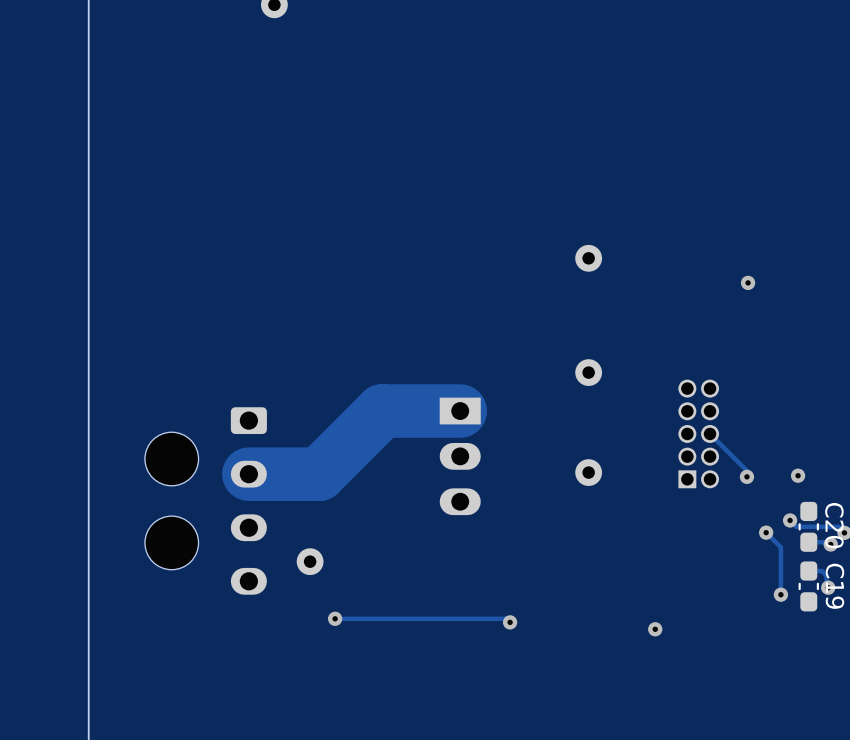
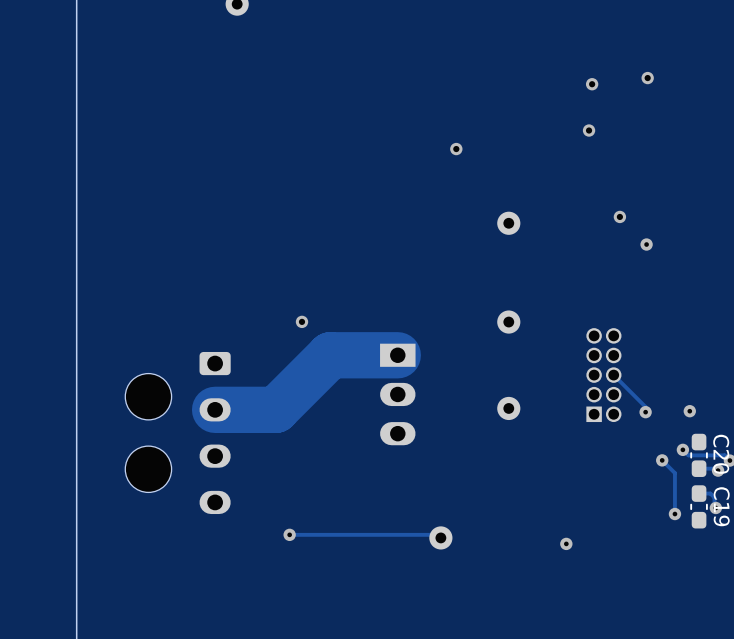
via: none -> (647, 78)
via: none -> (592, 84)
via: none -> (589, 130)
via: none -> (456, 149)
via: none -> (619, 216)
via: none -> (301, 321)
part position: (310, 561) -> (440, 537)
via: (510, 622) -> none

